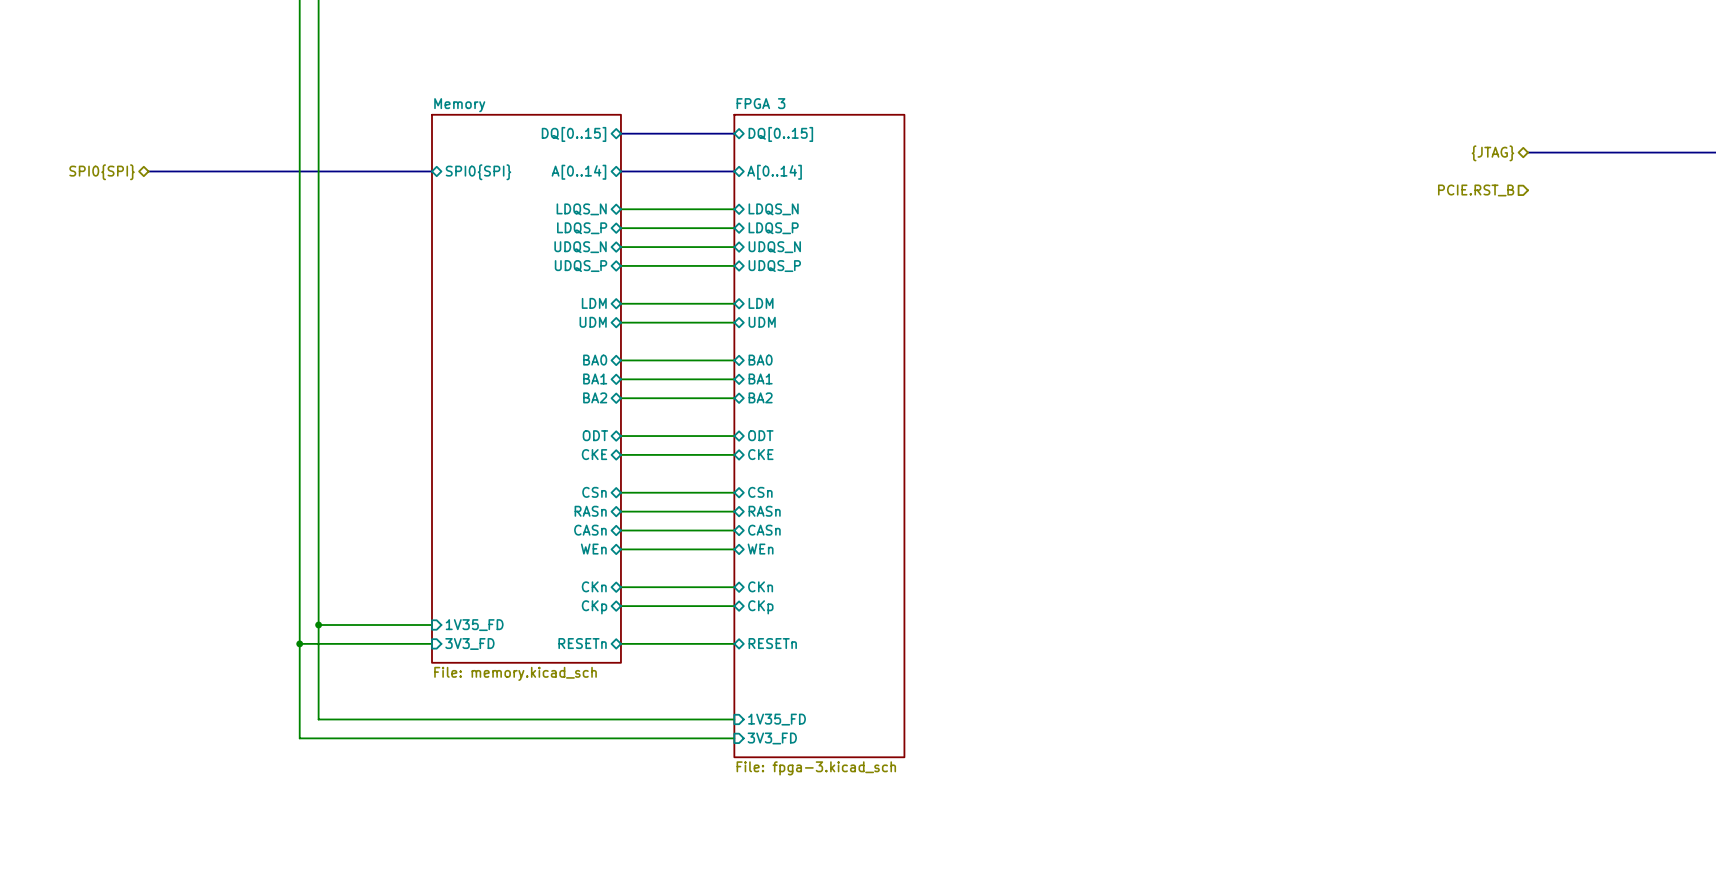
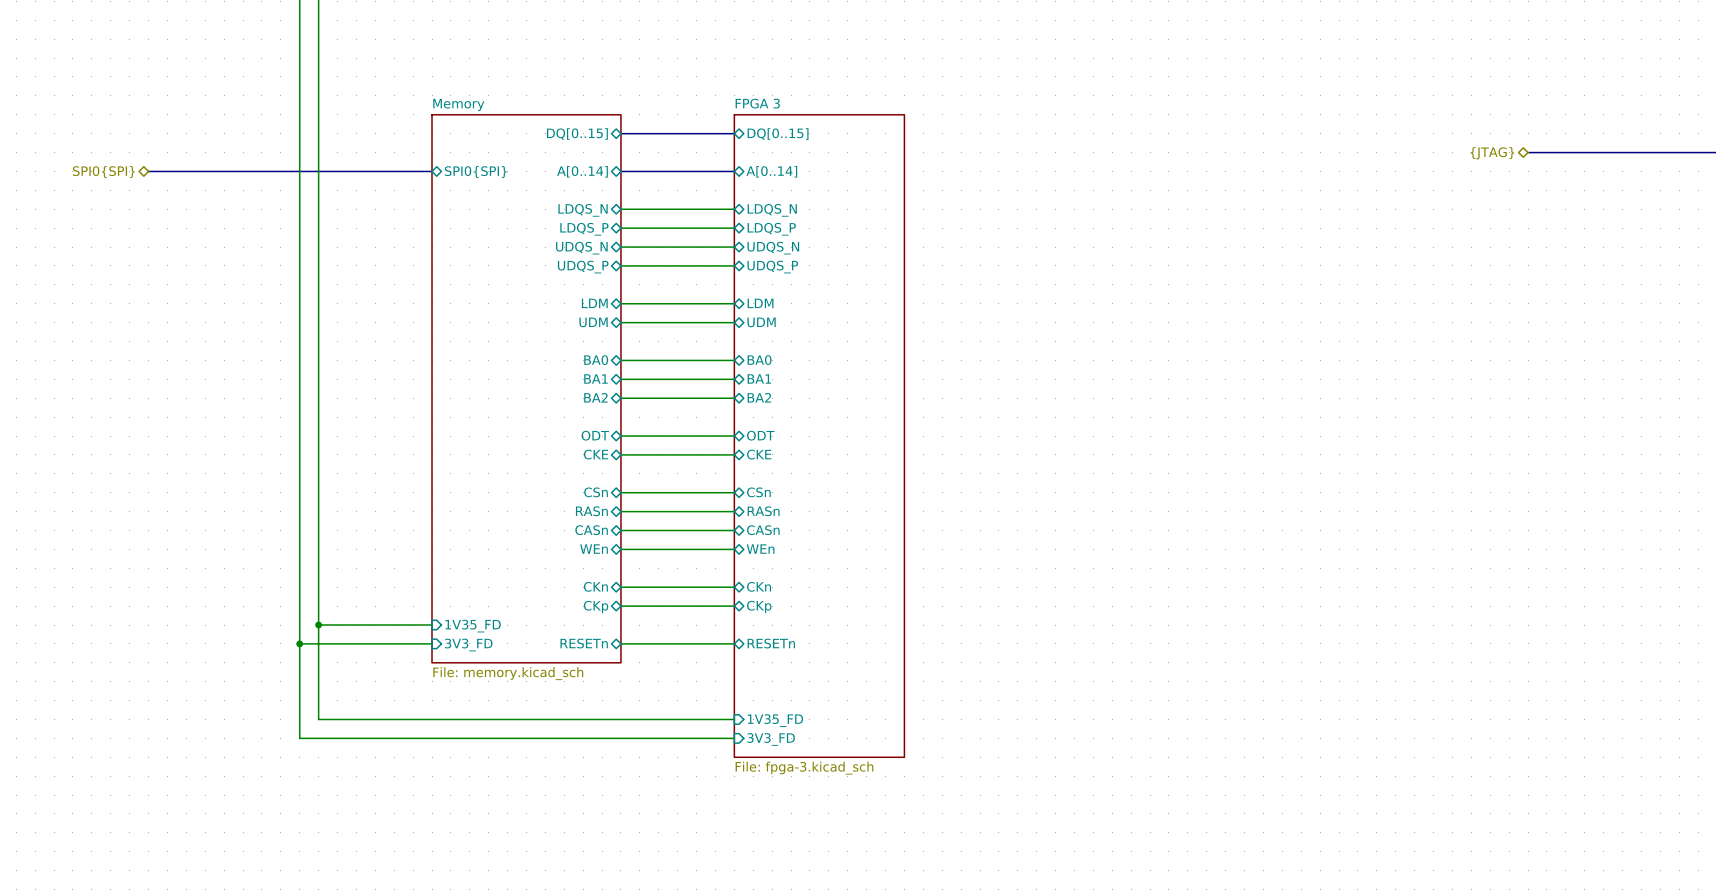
hierarchical label: PCIE.RST_B (1476, 190) -> none

